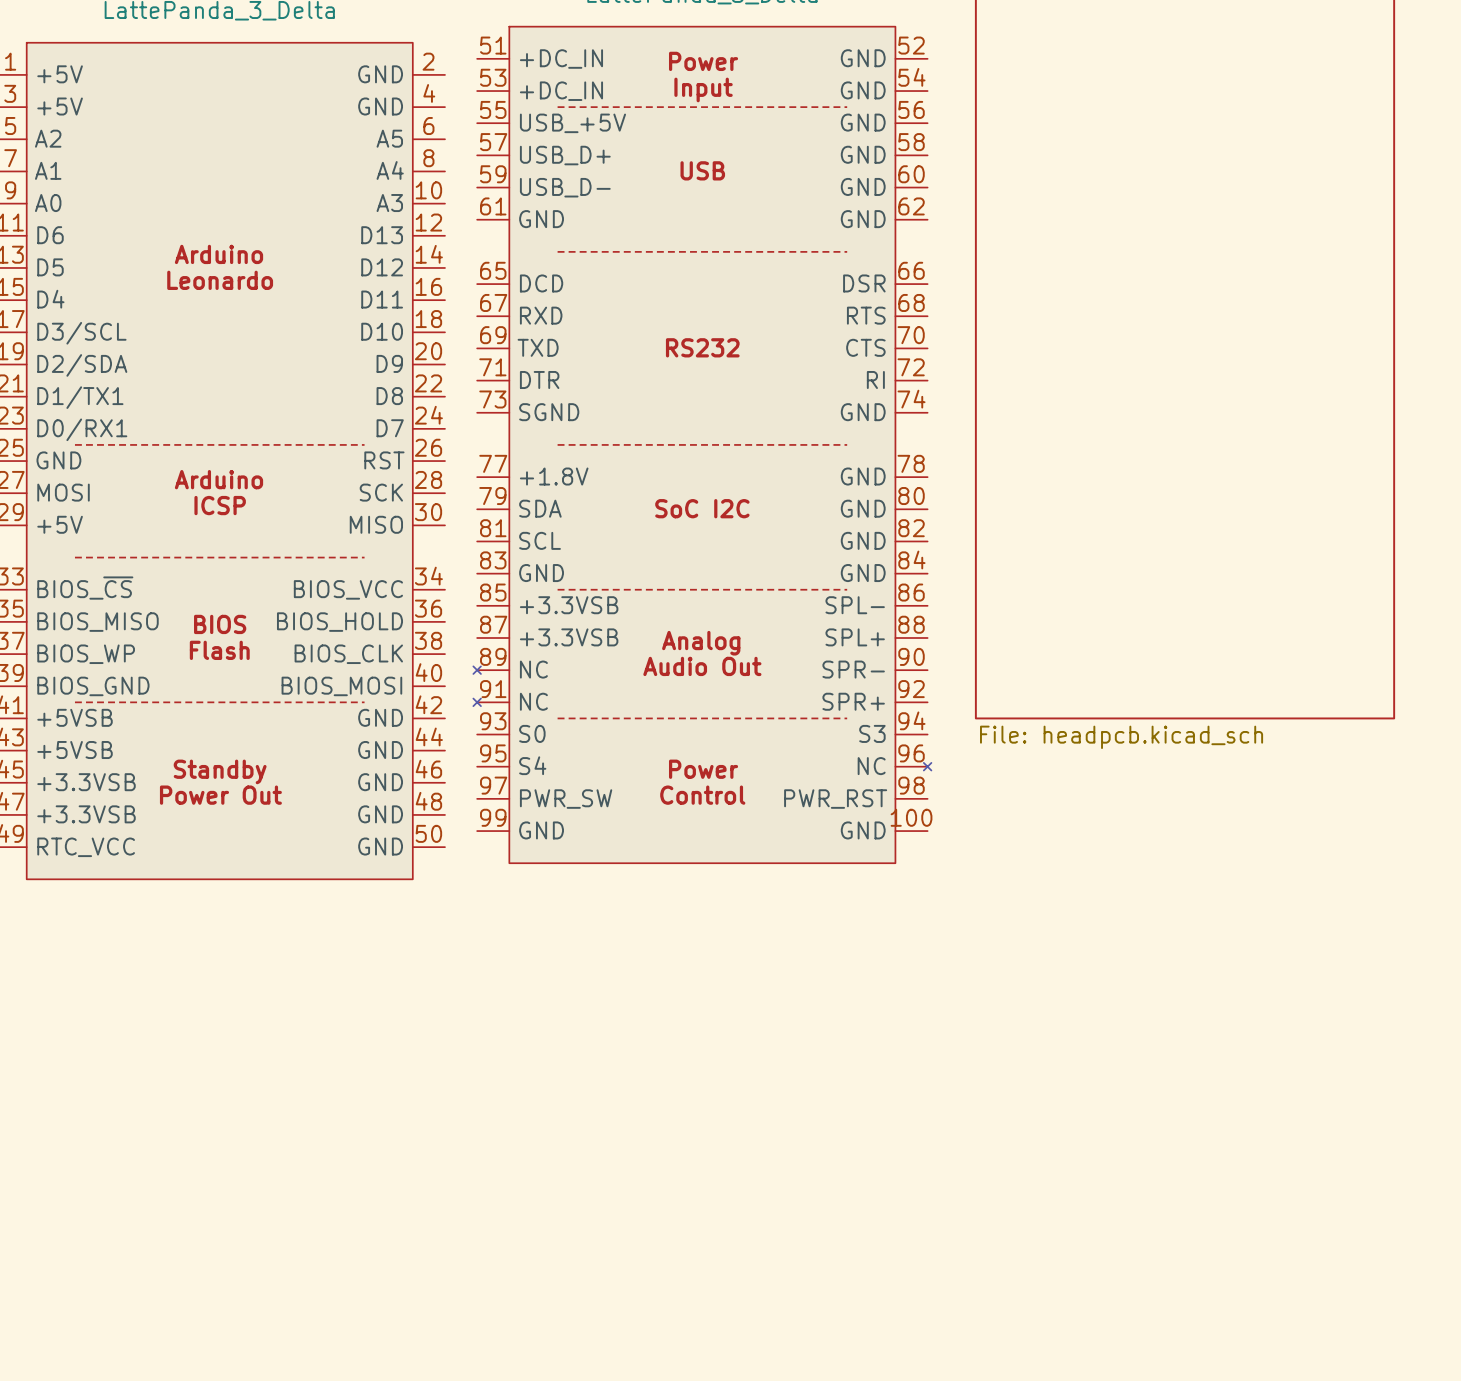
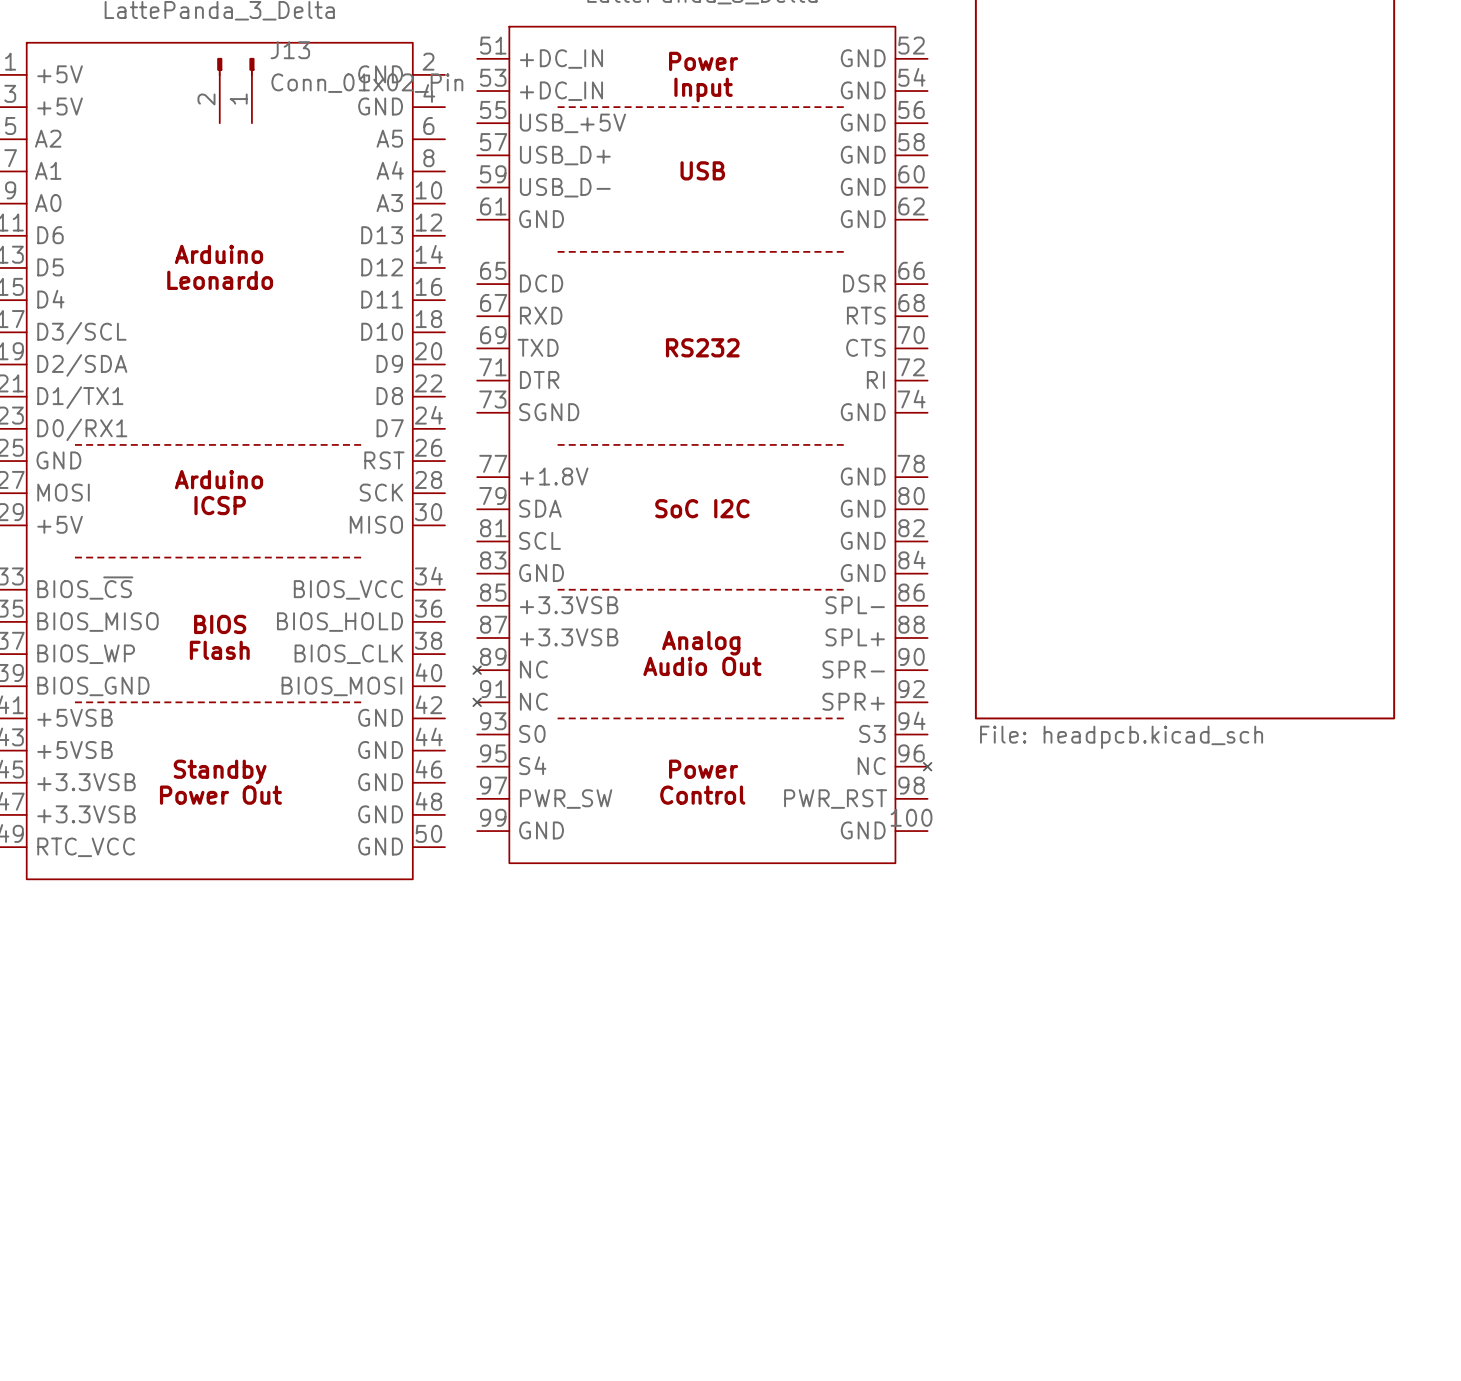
J13: none -> Conn_01x02_Pin (235, 90)

